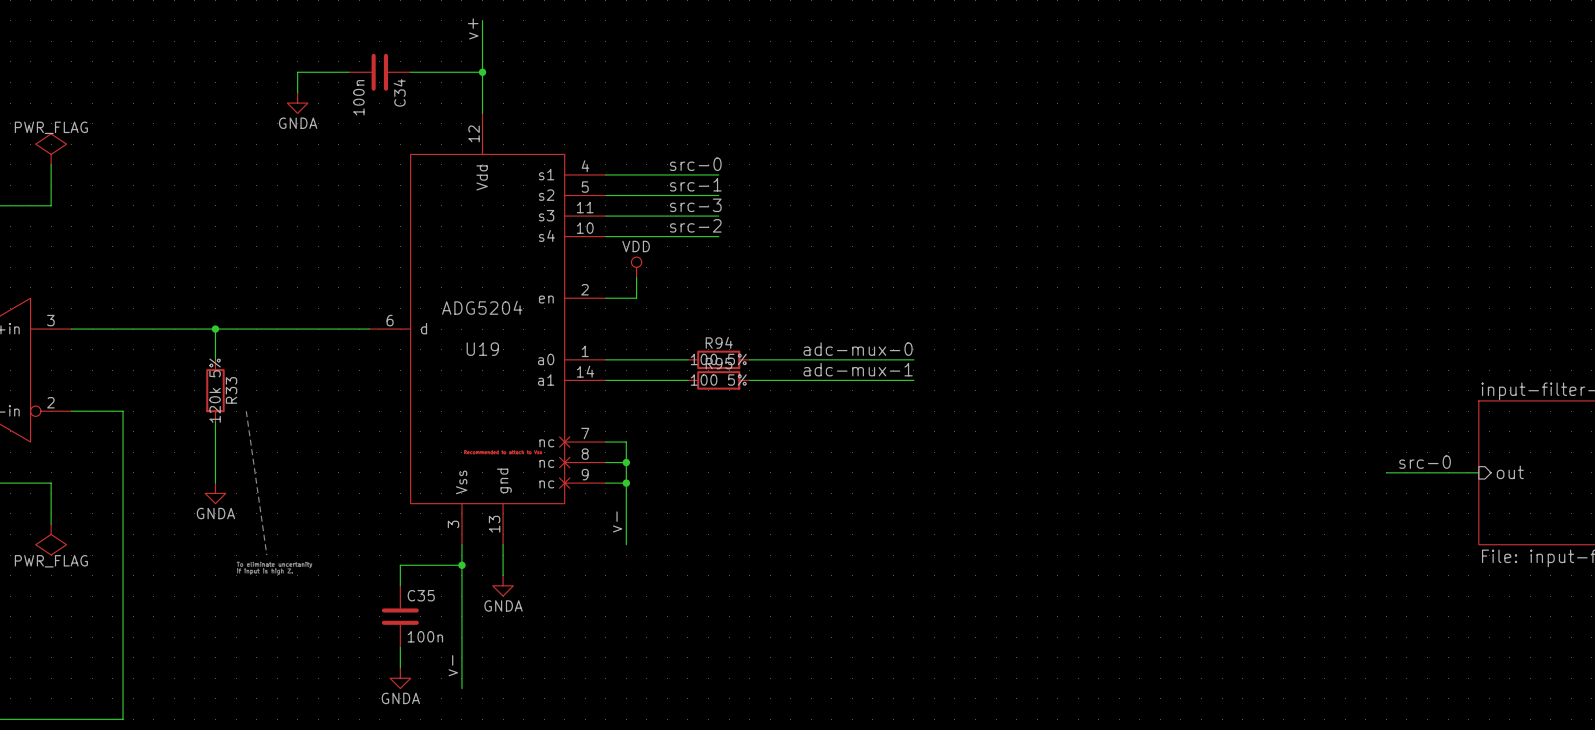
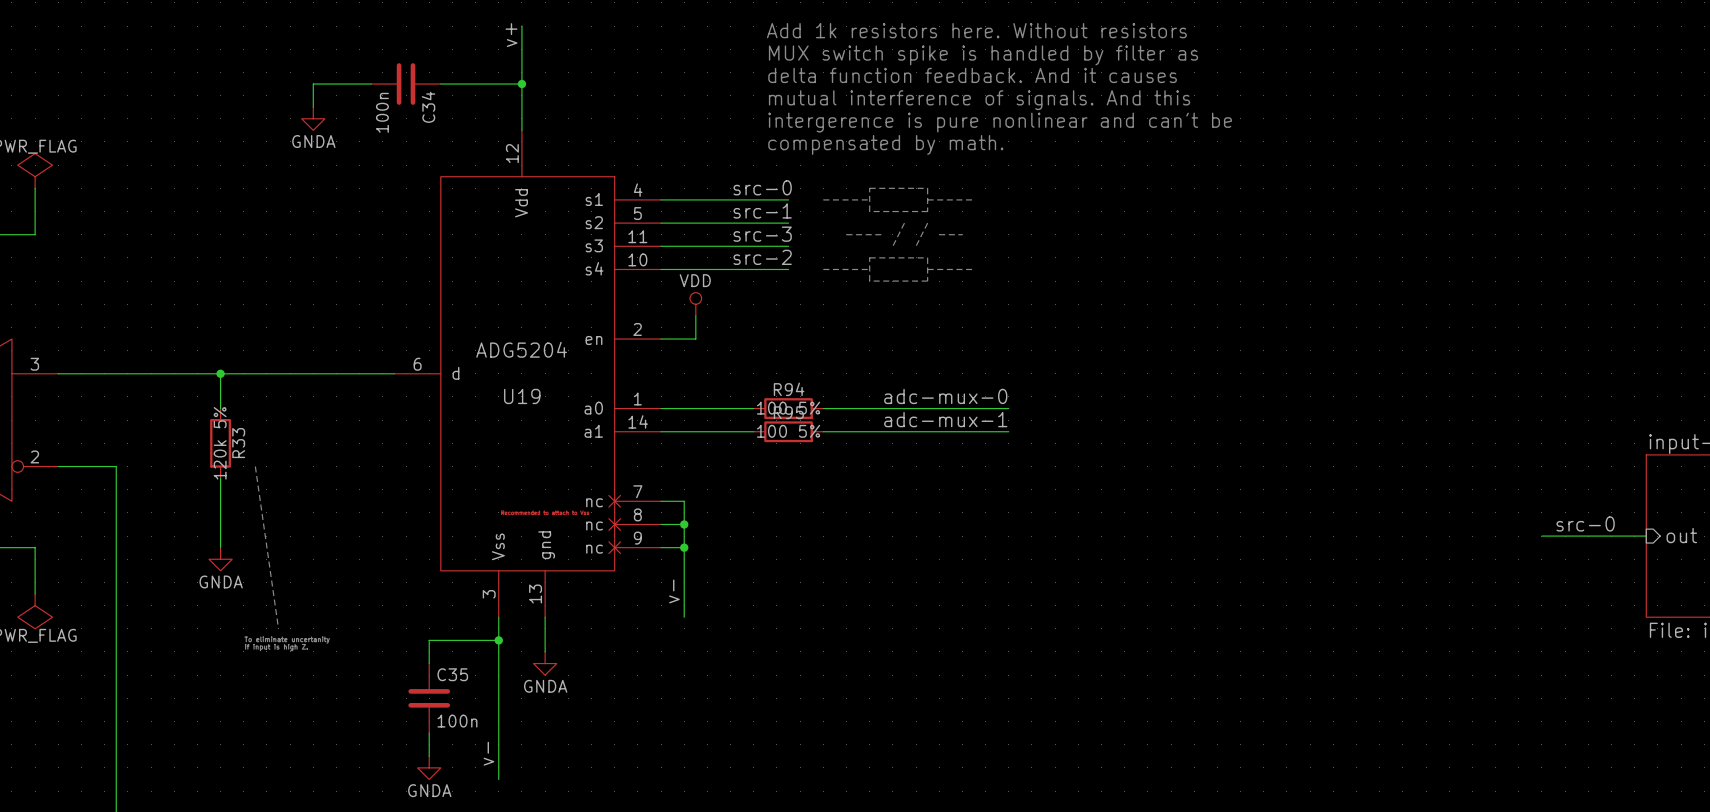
text: none -> Add 1k resistors here. Without resistors (976, 30)
text: none -> MUX switch spike is handled by filter as (983, 55)
text: none -> delta function feedback. And it causes (972, 75)
text: none -> mutual interference of signals. And this (979, 100)
text: none -> intergerence is pure nonlinear and can't be (1000, 122)
text: none -> compensated by math. (885, 144)
line: none -> (869, 188) (869, 211) (927, 211) (927, 188) (869, 188)
line: none -> (823, 199) (869, 199)
line: none -> (927, 199) (974, 199)
line: none -> (904, 223) (892, 246)
line: none -> (927, 223) (916, 246)
line: none -> (846, 234) (881, 234)
line: none -> (939, 234) (962, 234)
line: none -> (869, 257) (869, 281) (927, 281) (927, 257) (869, 257)
line: none -> (823, 269) (869, 269)
line: none -> (927, 269) (974, 269)

